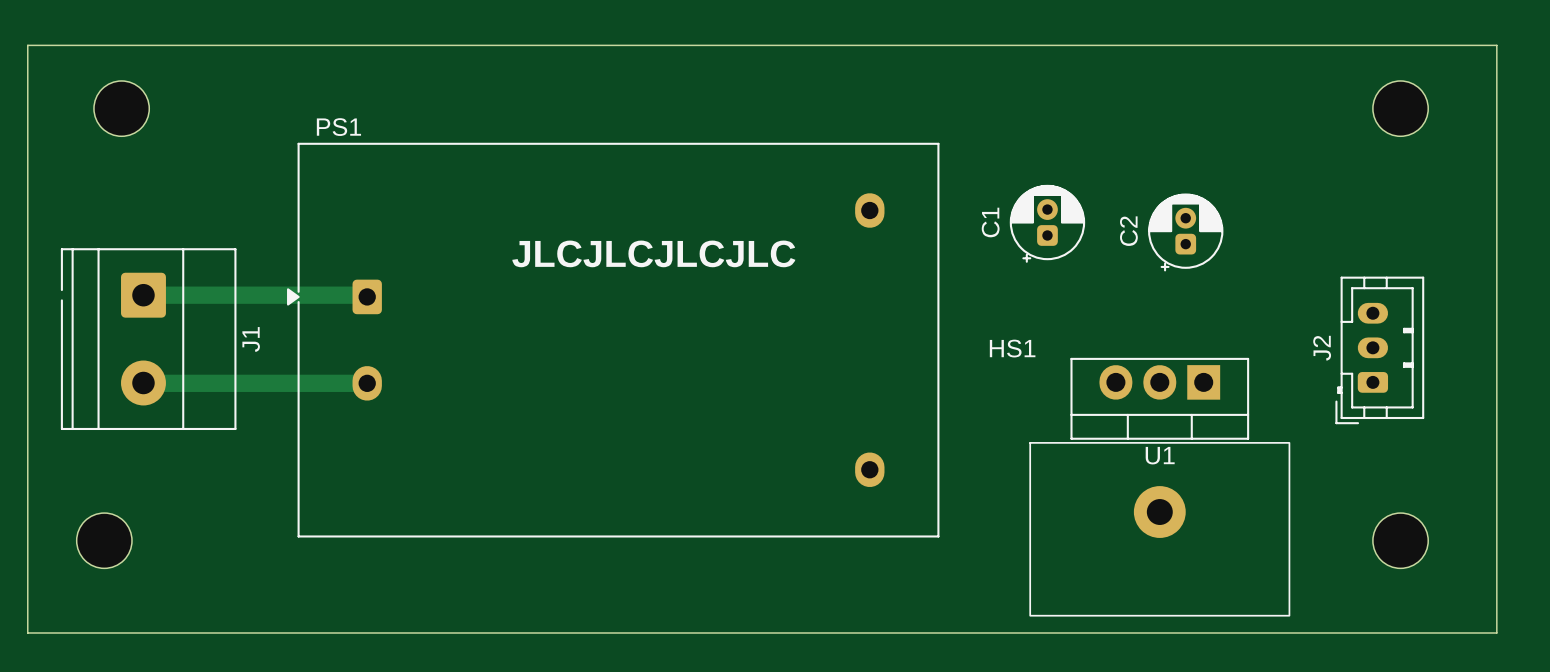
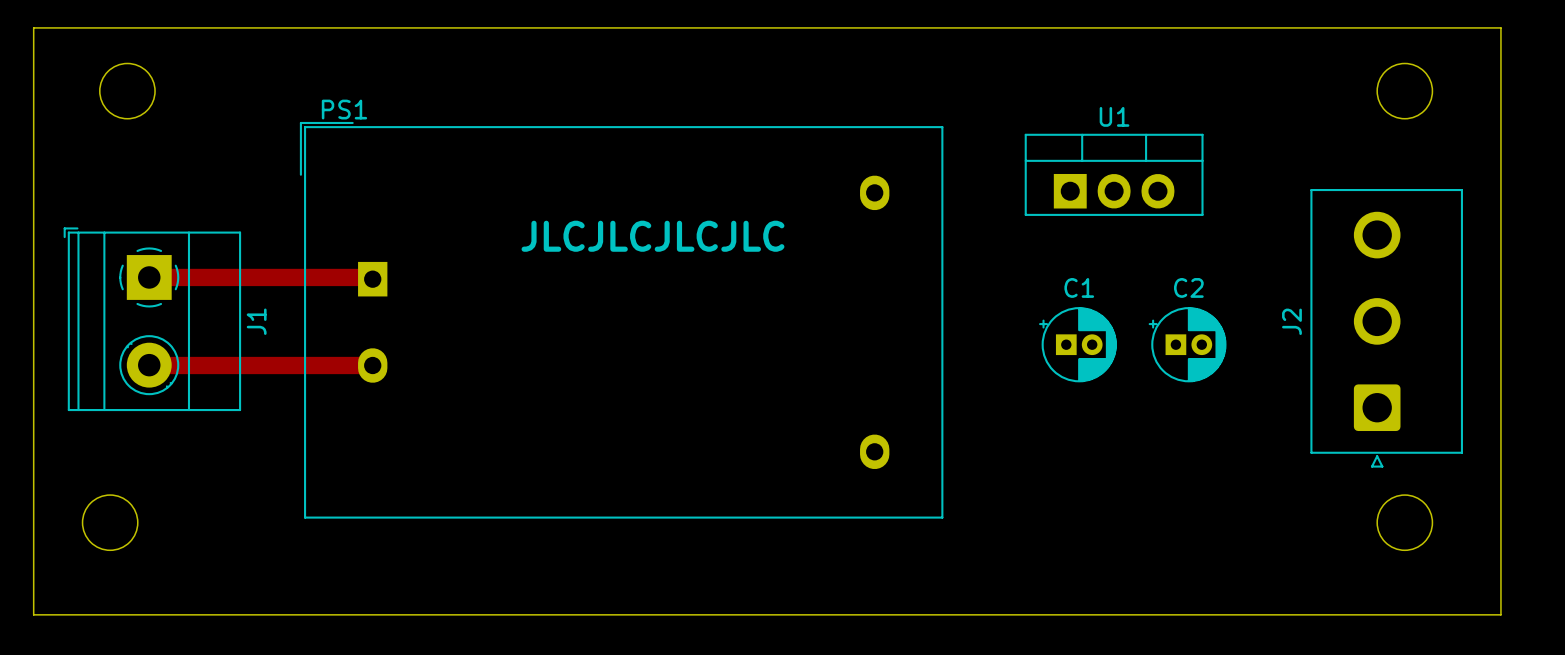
PS1 footprint: [287, 142, 940, 538] -> [299, 121, 944, 519]
C1 footprint: [1009, 184, 1086, 263] -> [1039, 307, 1117, 383]
C2 footprint: [1148, 193, 1224, 272] -> [1148, 307, 1227, 383]
C1 name position: C1 (990, 222) -> C1 (1079, 287)
C2 name position: C2 (1128, 231) -> C2 (1188, 287)
J1 footprint: [60, 248, 237, 431] -> [63, 227, 242, 412]
J2 footprint: [1335, 276, 1425, 425] -> [1310, 189, 1463, 468]
J2 name position: J2 (1322, 348) -> J2 (1291, 321)
U1 footprint: [1070, 357, 1250, 440] -> [1024, 133, 1204, 216]
U1 name position: U1 (1160, 455) -> U1 (1114, 116)
HS1: (1159, 529) -> none

